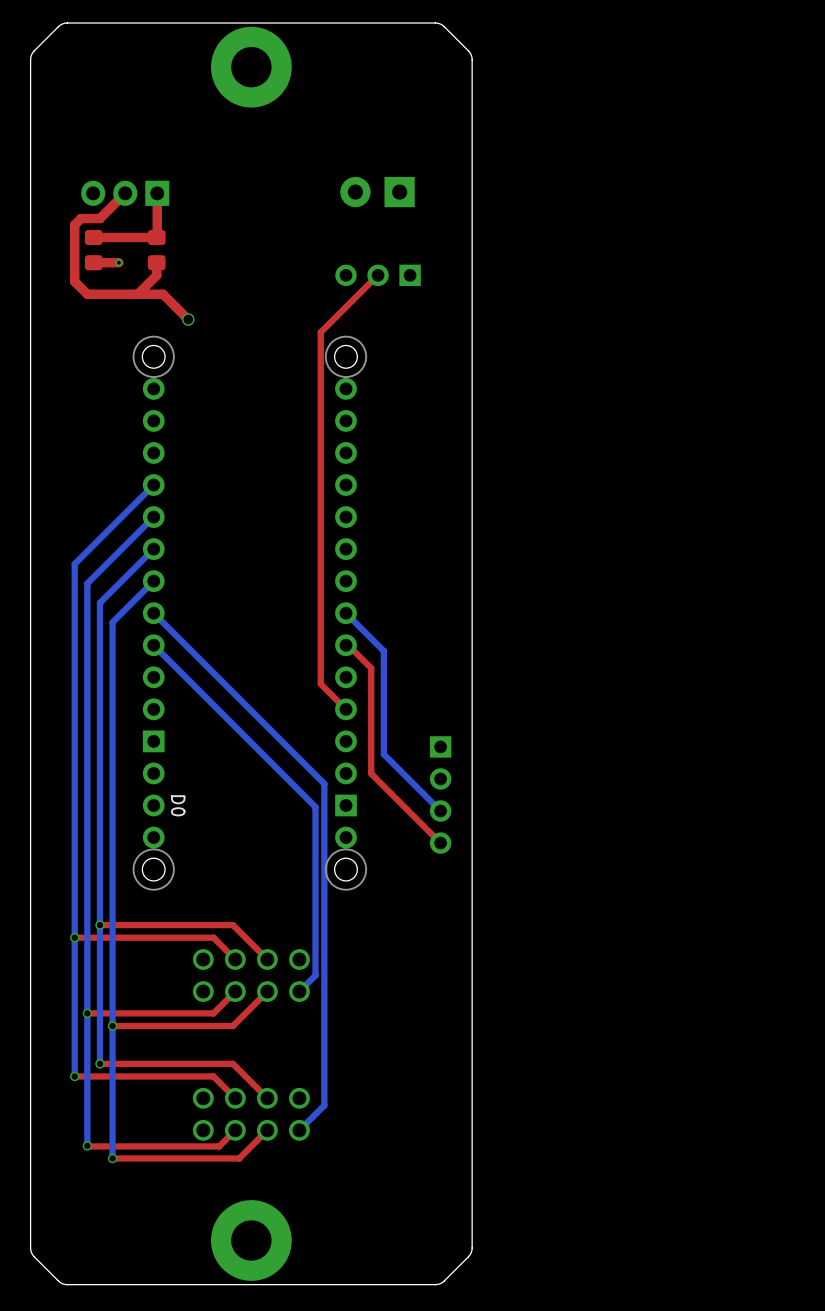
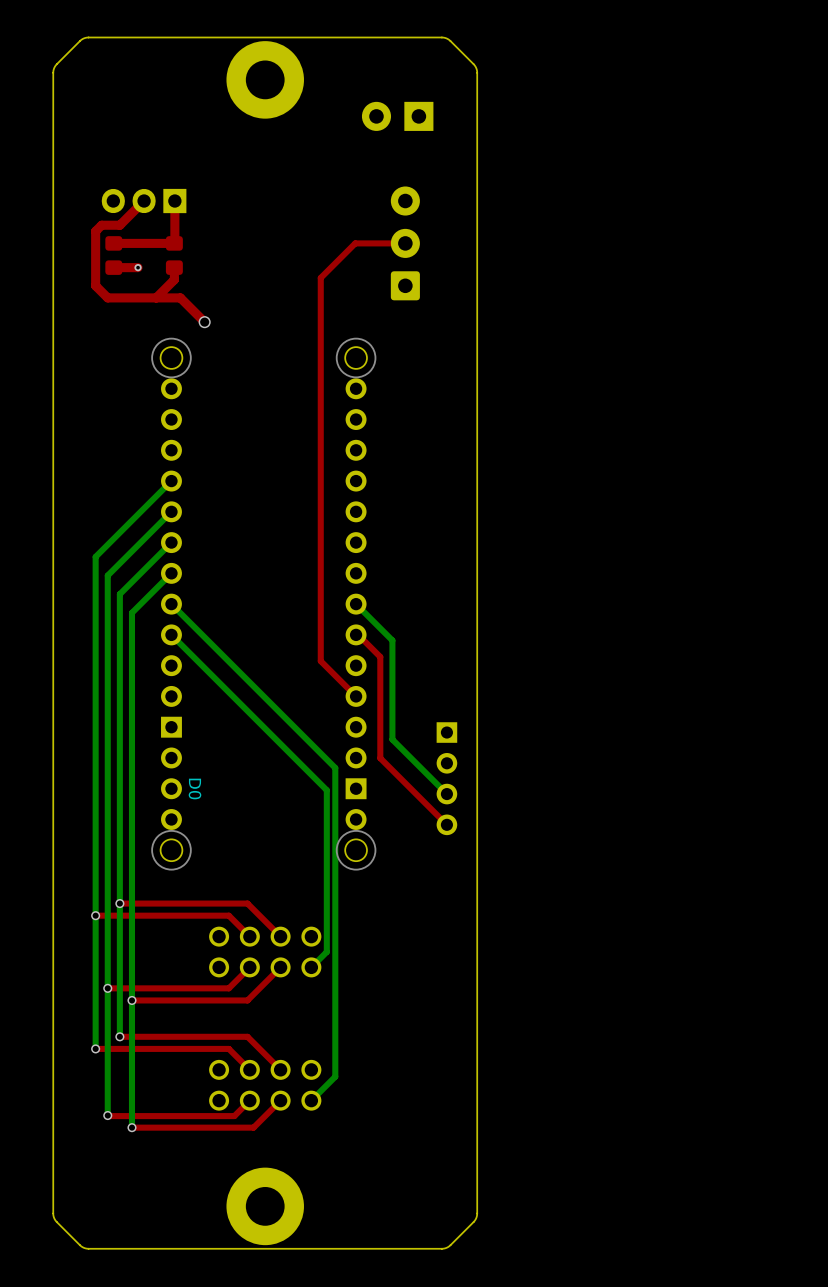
part position: (377, 192) -> (397, 116)
part: none -> (405, 243)
top track: (377, 275) (320, 332) (320, 684) -> (405, 243) (355, 243) (320, 277) (320, 661) (331, 672)
part: (378, 275) -> none

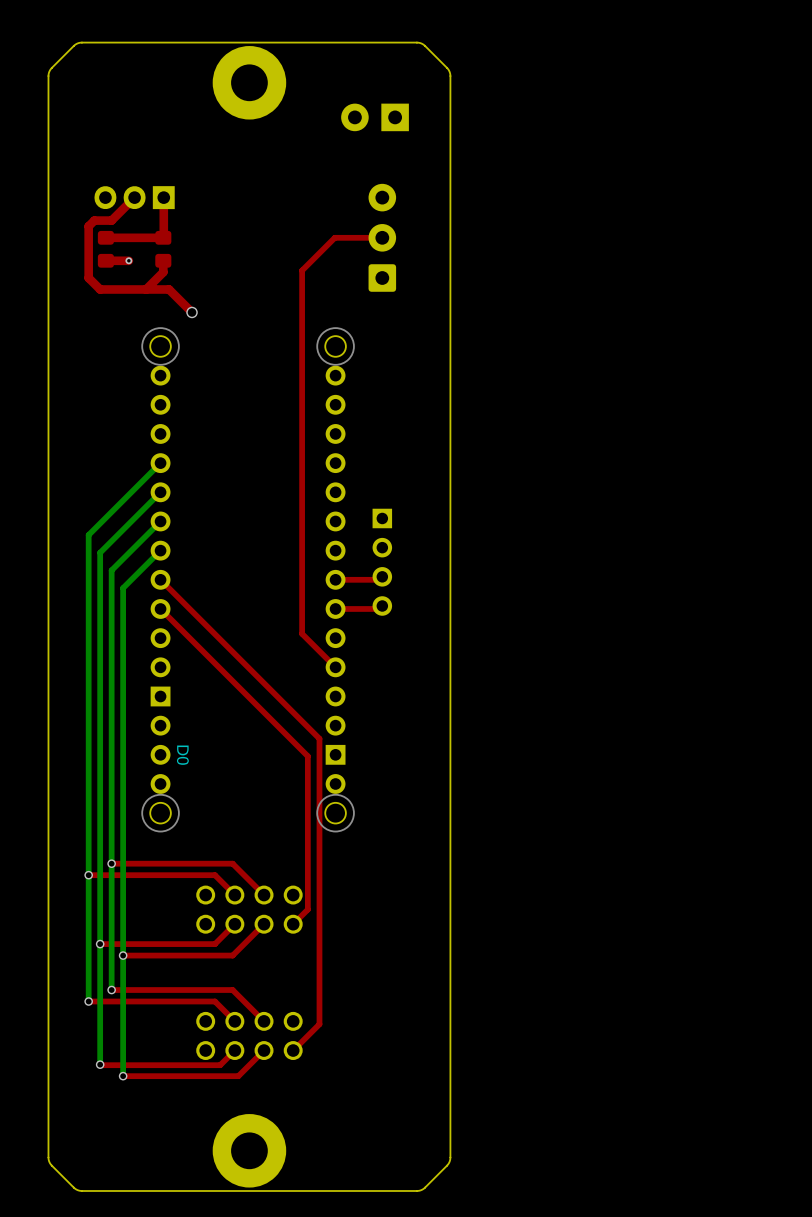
top track: none -> (382, 576) (379, 579) (335, 579)
top track: none -> (160, 579) (319, 738) (319, 1024) (293, 1050)
bottom track: (171, 604) (335, 767) (335, 1076) (311, 1100) -> none
bottom track: (356, 604) (392, 640) (392, 739) (446, 794) -> none
top track: none -> (160, 608) (307, 756) (307, 909) (293, 924)
bottom track: (171, 634) (326, 790) (326, 951) (311, 967) -> none
top track: (358, 634) (380, 656) (380, 758) (446, 824) -> (337, 608) (379, 608) (382, 605)
part position: (446, 778) -> (382, 562)

